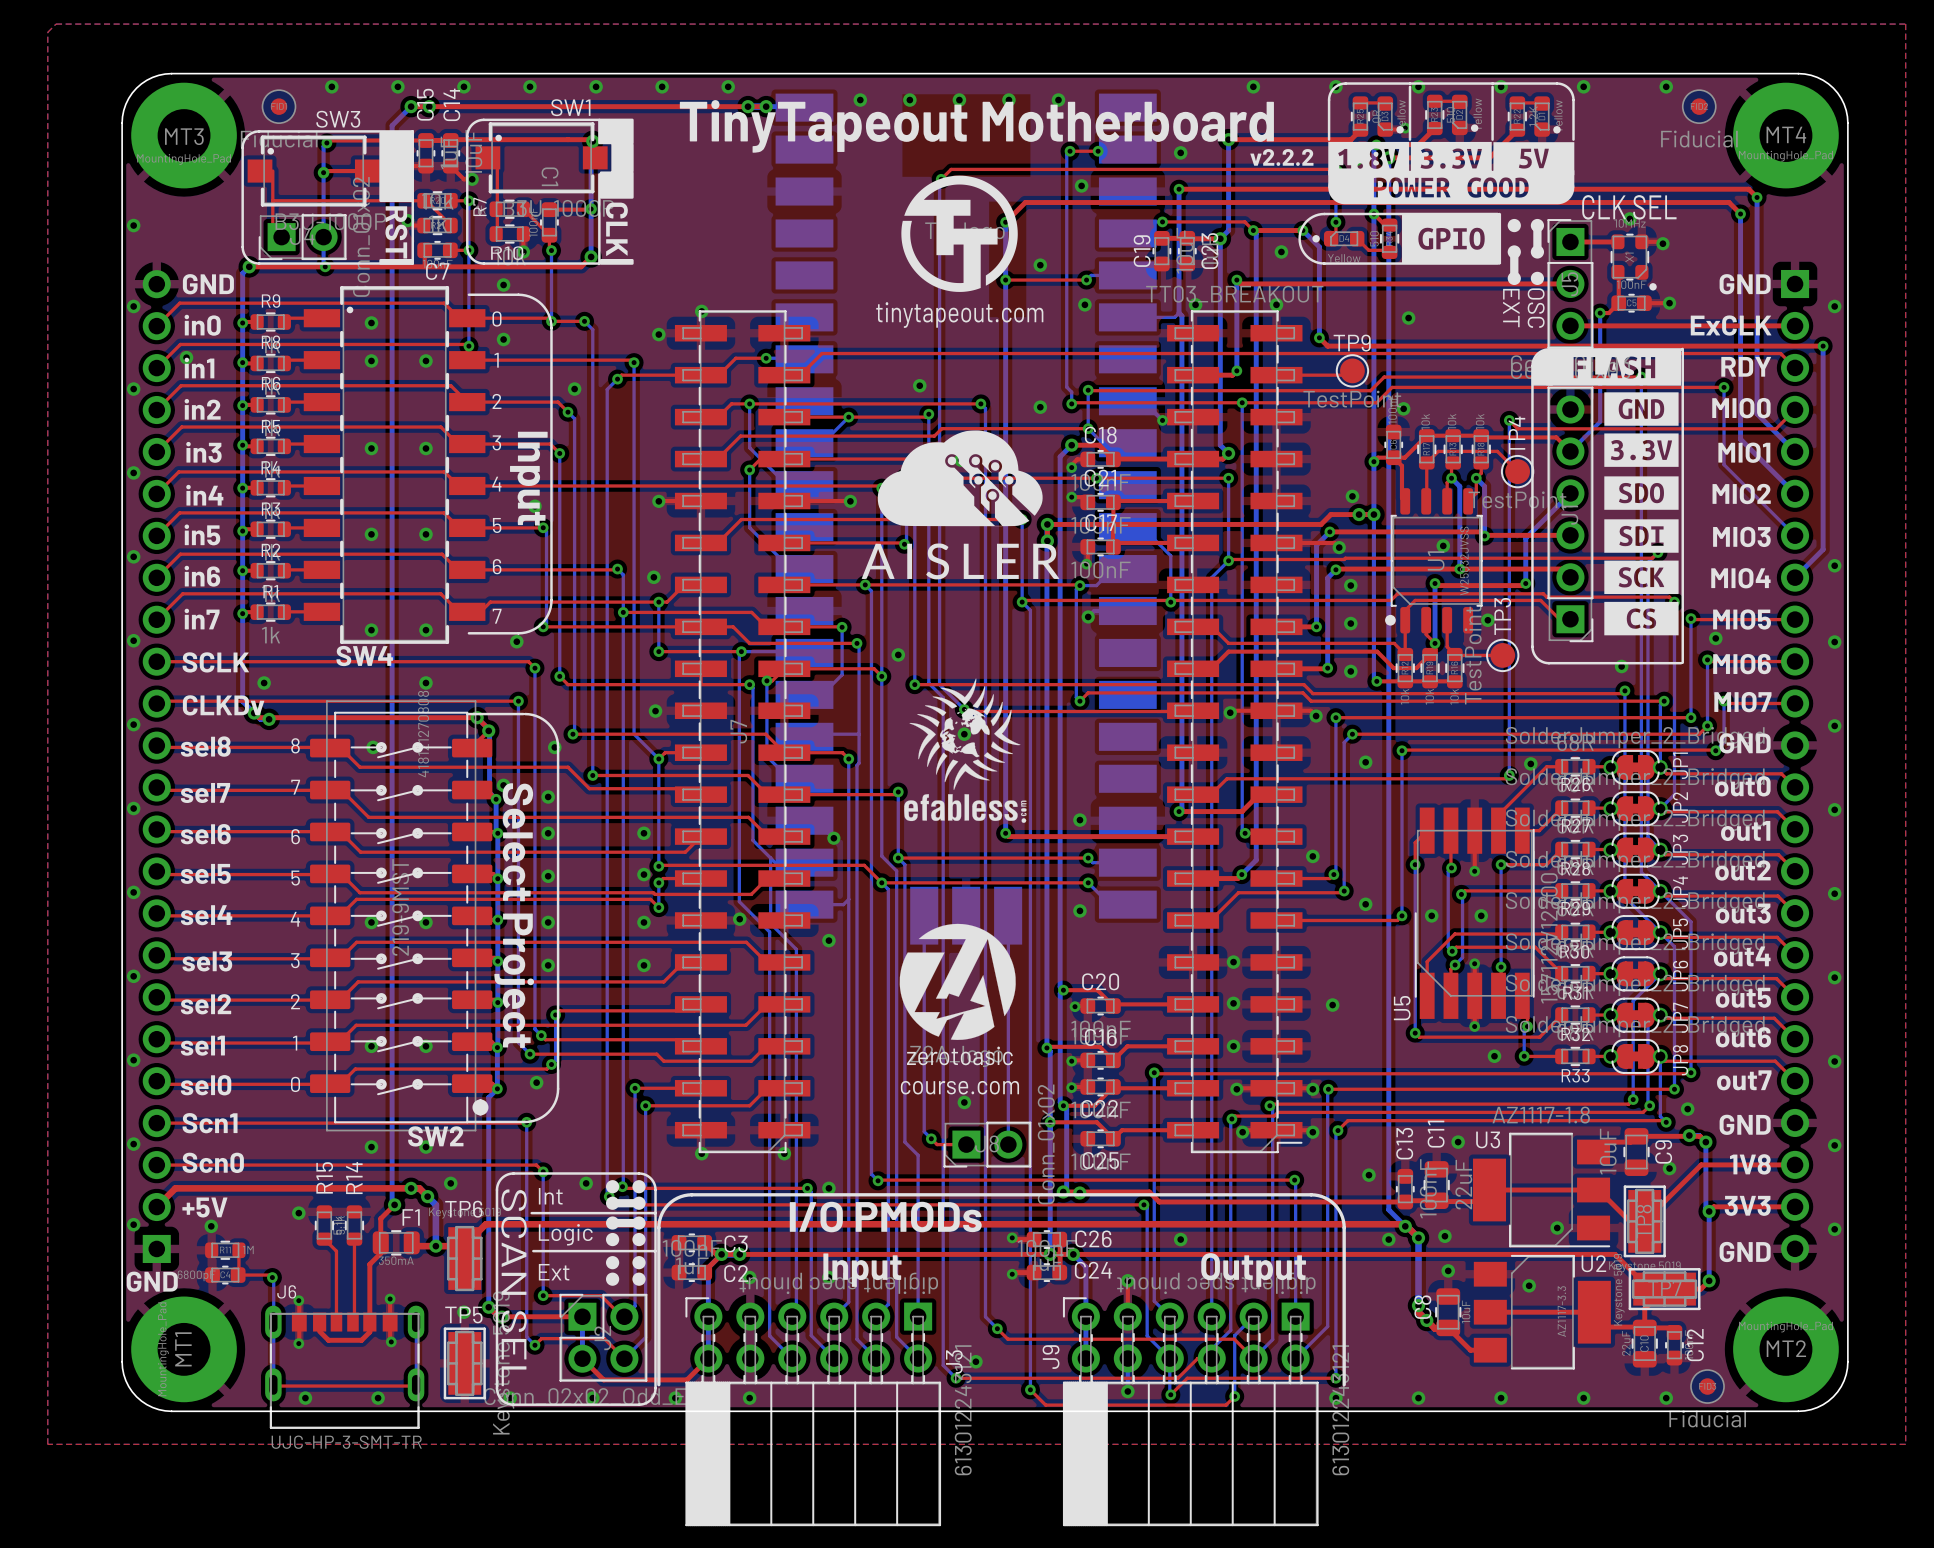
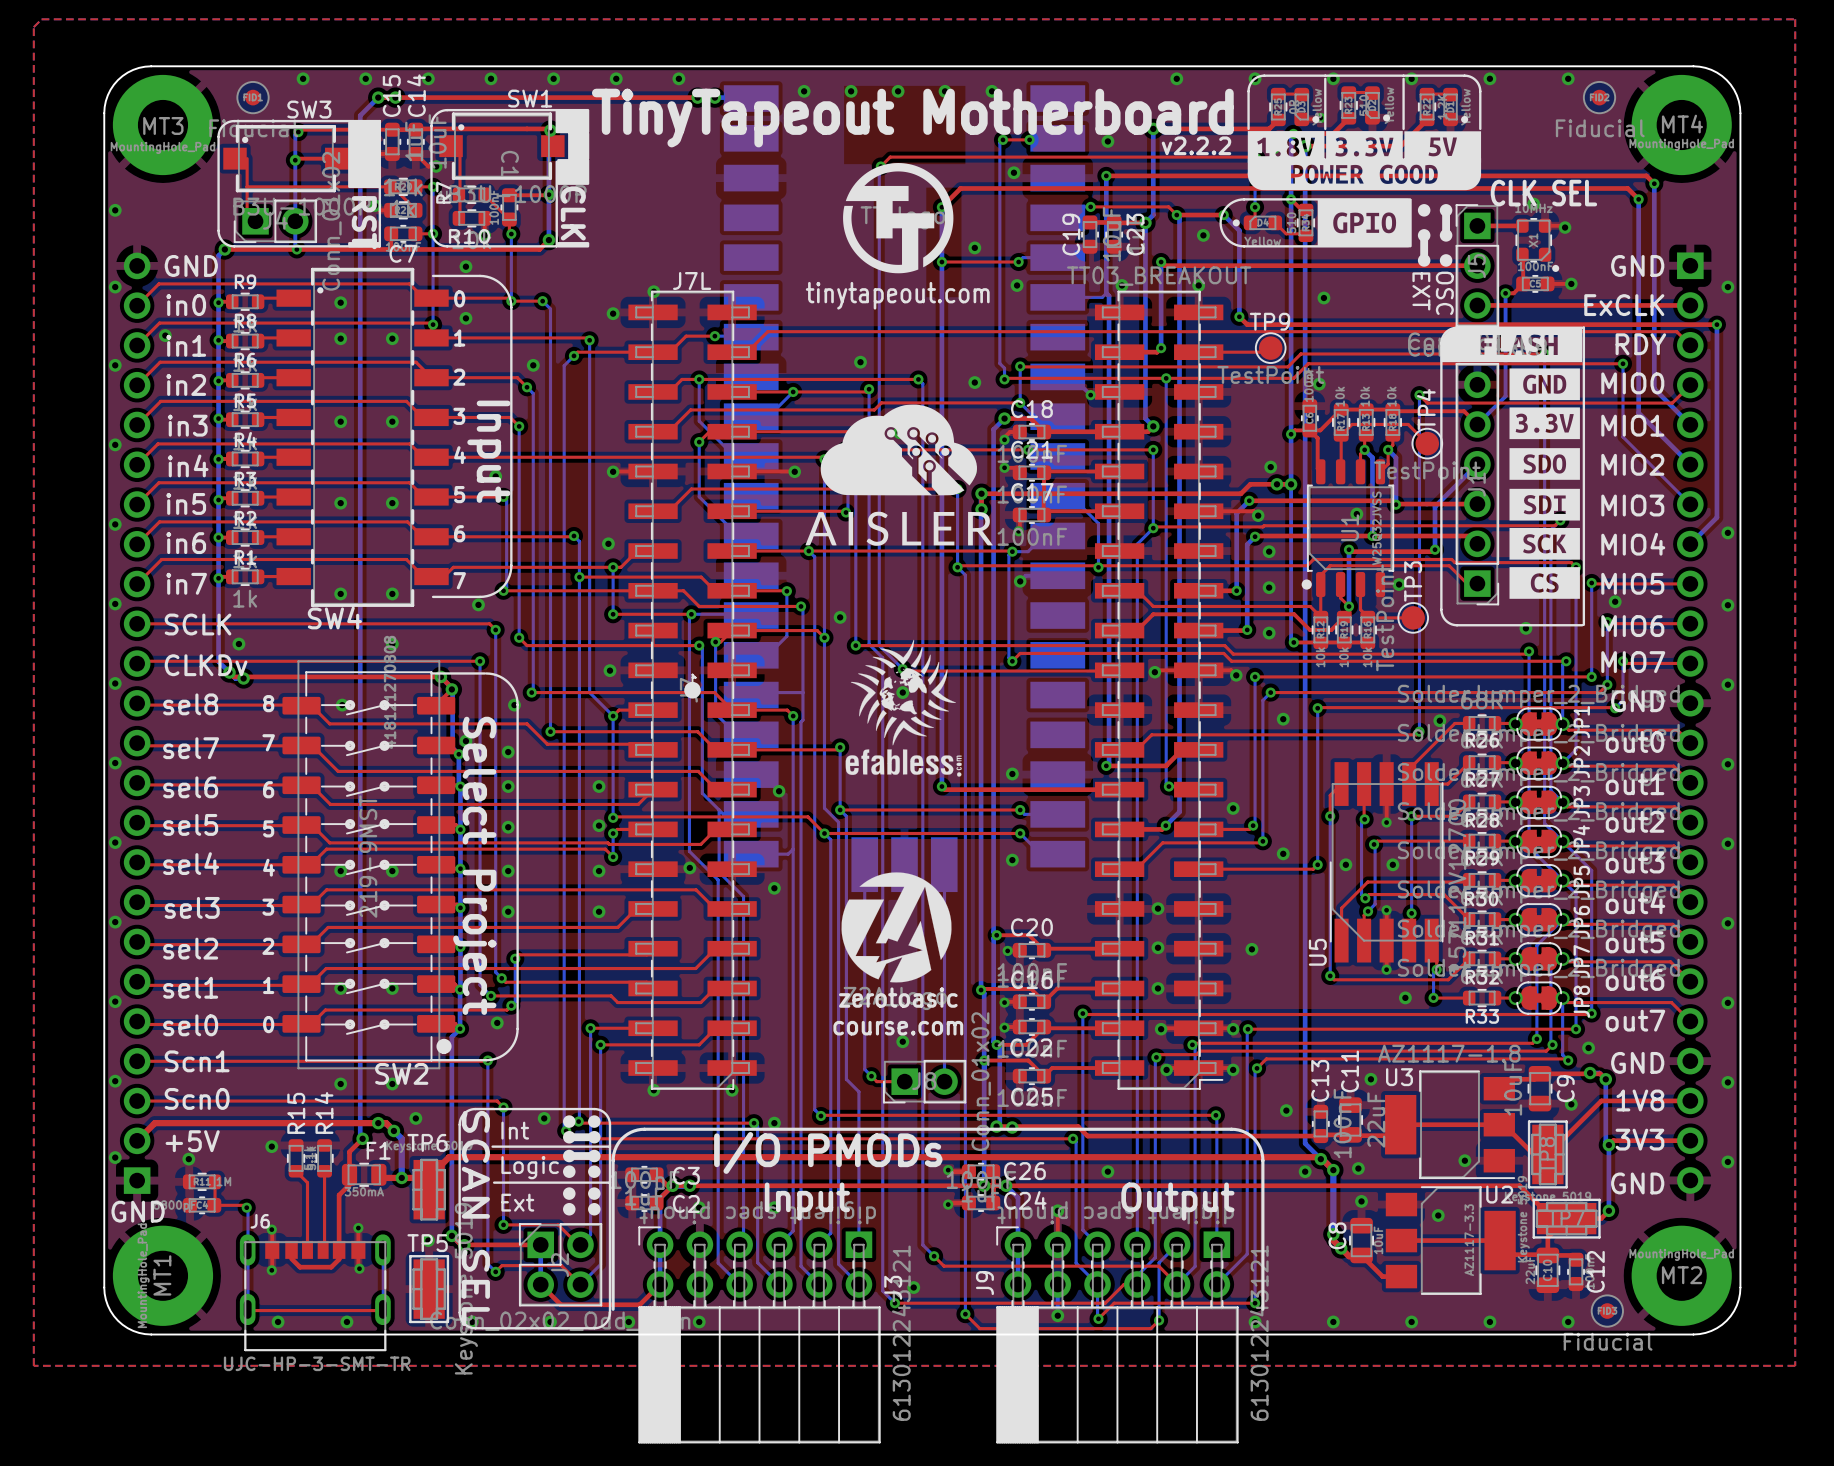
J7L: none -> (692, 686)

